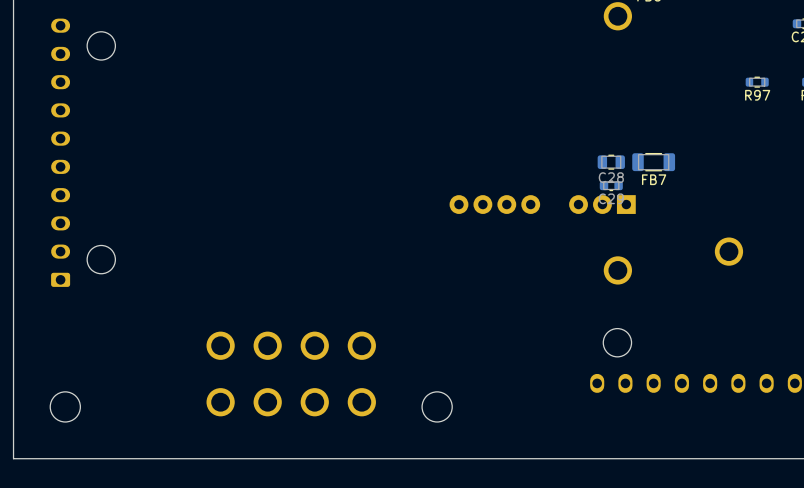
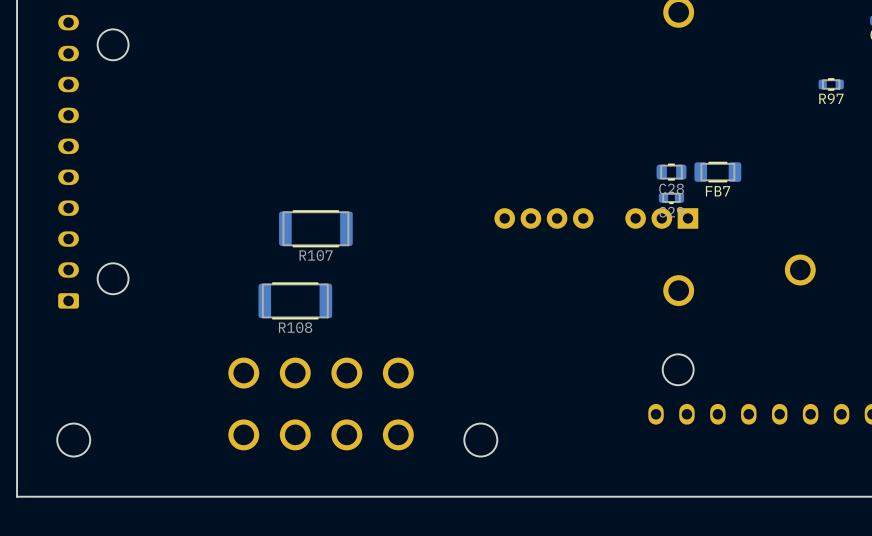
R107: none -> (315, 228)
R108: none -> (295, 300)

